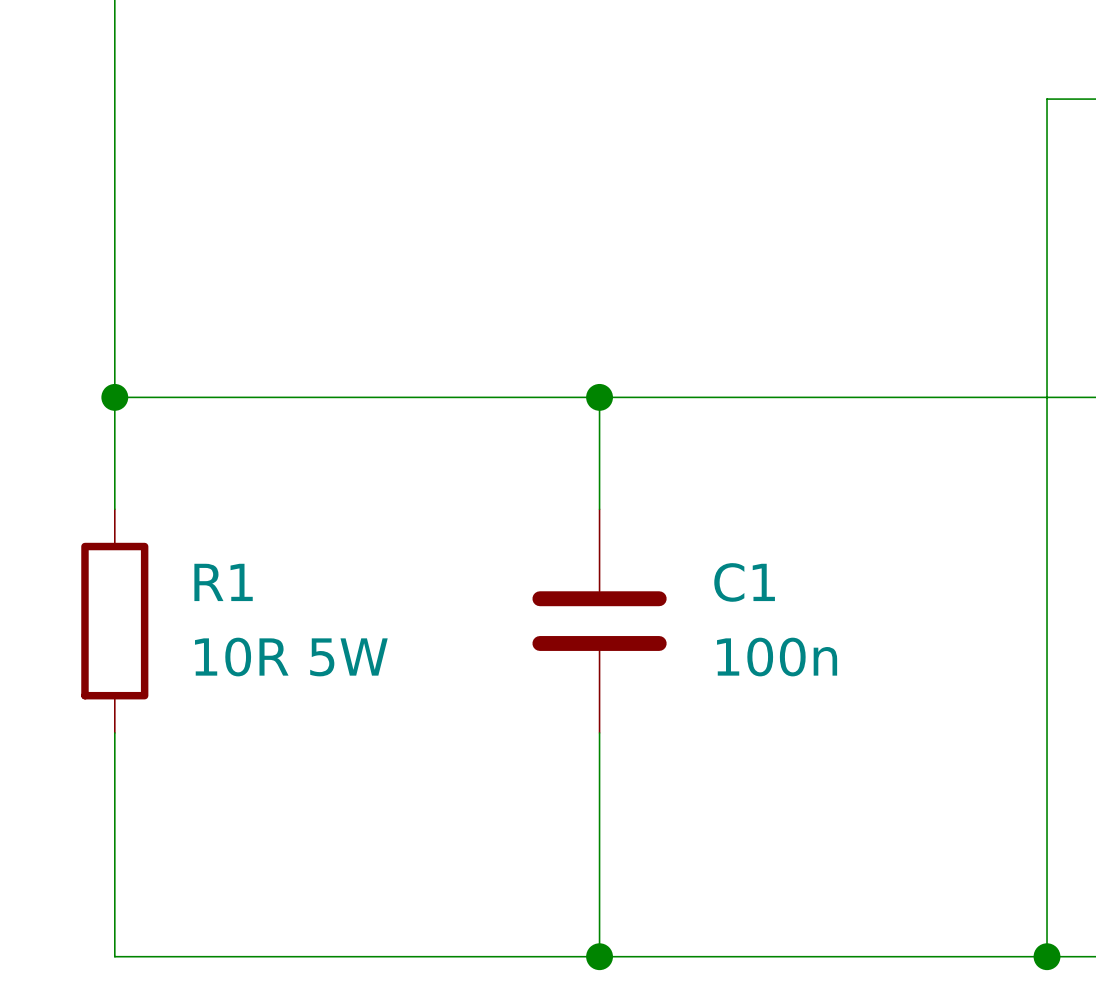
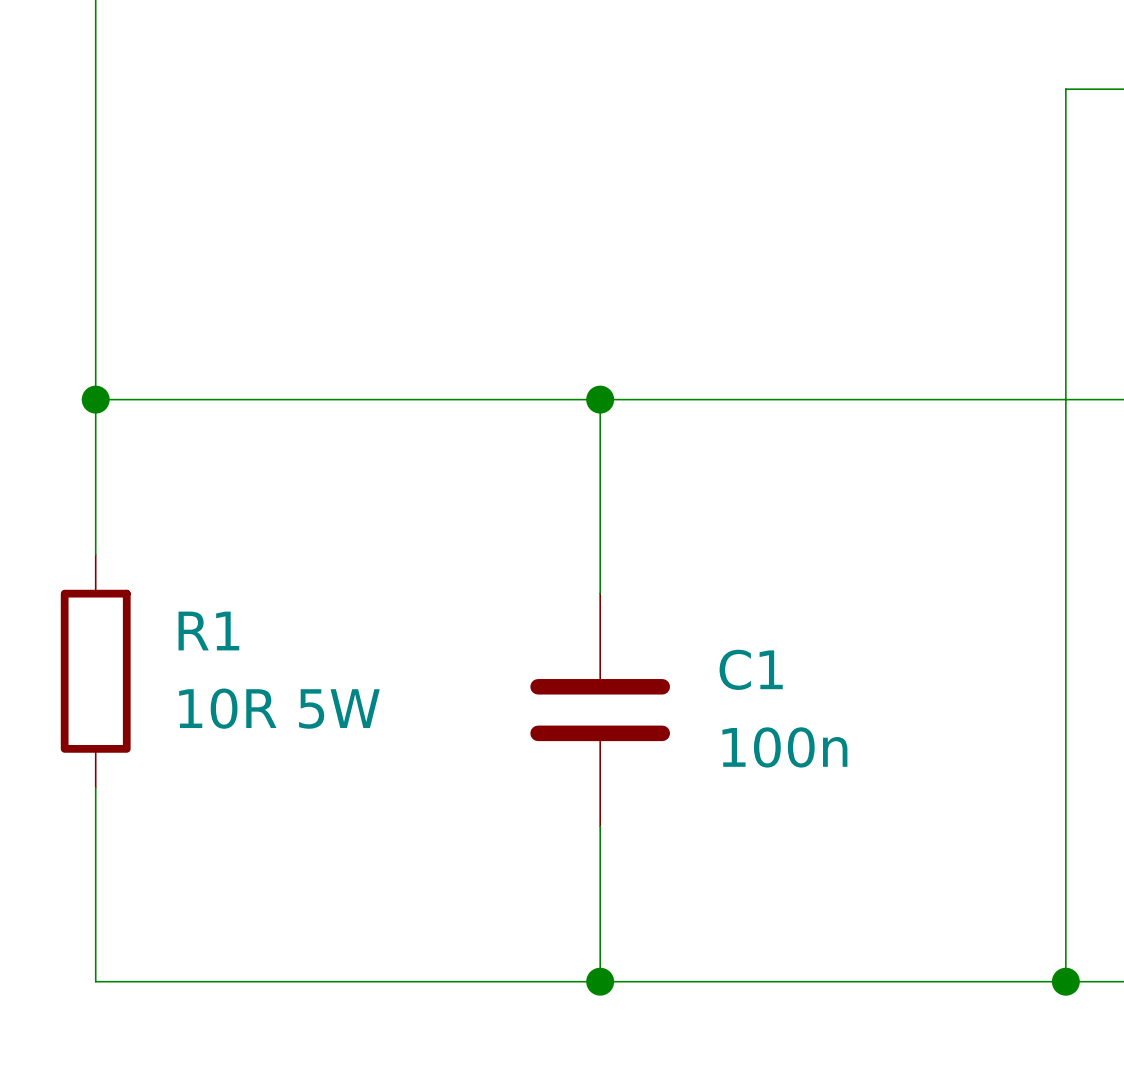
R1 position: (114, 621) -> (95, 671)
C1 position: (599, 621) -> (600, 710)

